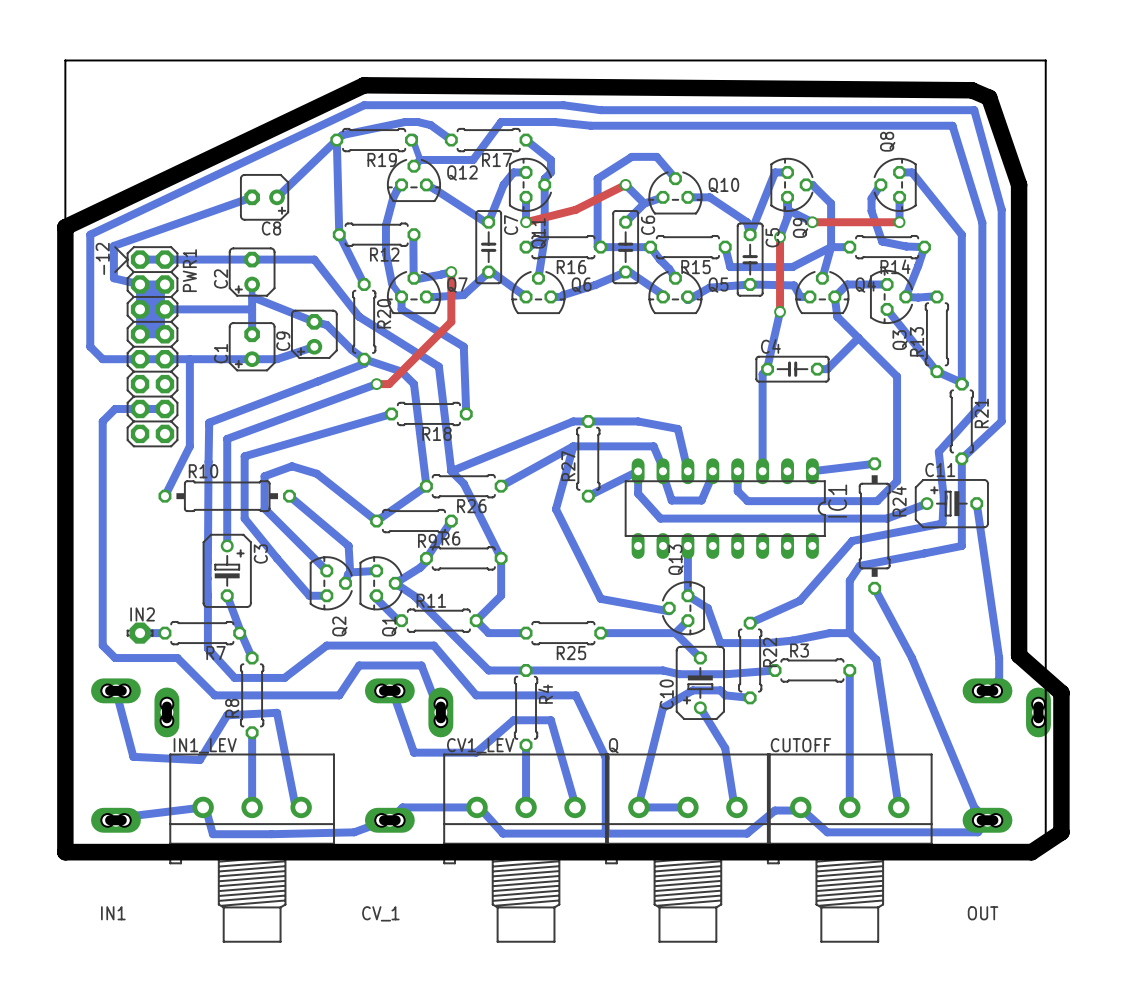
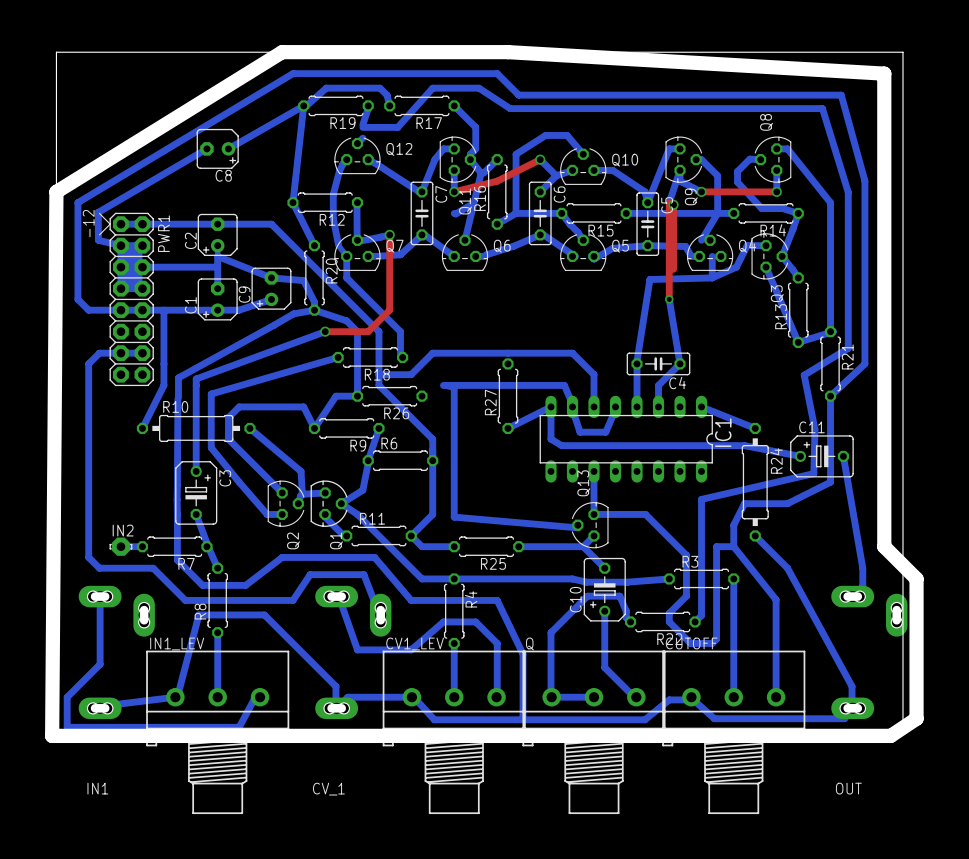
bottom track: (600, 110) (563, 105) (364, 105) (90, 234) -> (518, 95) (497, 73) (292, 73) (77, 202)
bottom track: none -> (303, 105) (306, 105) (326, 88) (380, 88) (387, 95) (389, 105)
bottom track: none -> (303, 105) (228, 148)
bottom track: (590, 125) (554, 122) (501, 122) (473, 159) (420, 159) (412, 139) (413, 138) (411, 140) -> (510, 108) (478, 88) (432, 88) (397, 127) (362, 127) (368, 105)
bottom track: (336, 140) (339, 234) -> (303, 105) (292, 202)
bottom track: (336, 140) (277, 197) -> none
bottom track: (336, 140) (342, 135) (405, 122) (417, 122) (430, 125) (451, 140) -> none
R19 position: (374, 140) -> (335, 105)
R17 position: (488, 140) -> (421, 105)
bottom track: (526, 140) (550, 159) -> (454, 105) (475, 127) (475, 138)
bottom track: (544, 184) (544, 237) (538, 278) -> (481, 173) (464, 240)
bottom track: none -> (470, 159) (481, 173)
bottom track: none -> (497, 159) (483, 173) (481, 173)
bottom track: (880, 184) (871, 198) (871, 211) (882, 241) (906, 246) (924, 247) -> (760, 159) (749, 159) (737, 171) (737, 182) (761, 208) (782, 208) (798, 213)
bottom track: (252, 197) (113, 245) -> (206, 148) (98, 212)
C8 position: (264, 197) -> (217, 148)
bottom track: none -> (680, 170) (669, 202)
bottom track: (787, 209) (787, 217) (780, 237) -> none
top track: none -> (669, 202) (669, 299)
R16 rotation: 0° (563, 247) -> 90° clockwise (497, 191)
bottom track: none -> (516, 213) (497, 224)
bottom track: (725, 247) (730, 267) (792, 267) (831, 247) (822, 278) -> (626, 213) (717, 213) (701, 240)
bottom track: (314, 259) (359, 316) (438, 366) (451, 471) -> (271, 224) (378, 331) (378, 385) (432, 439) (432, 482)
bottom track: (865, 284) (847, 284) (834, 296) (837, 316) (897, 376) (897, 481) (877, 501) (747, 501) (737, 491) (737, 471) -> (712, 277) (649, 279) (637, 361) (637, 406)
bottom track: none -> (747, 245) (736, 267) (712, 277)
bottom track: none -> (712, 256) (712, 277)
bottom track: (905, 296) (936, 296) -> (782, 256) (798, 277)
bottom track: (401, 309) (463, 346) (466, 413) -> (346, 267) (346, 277) (400, 331) (400, 353)
bottom track: (887, 309) (936, 371) (964, 384) -> (766, 267) (798, 342) (833, 331)
bottom track: (780, 311) (767, 369) (762, 374) (762, 446) -> (669, 299) (680, 363) (658, 385)
via: (780, 311) -> none
bottom track: (314, 321) (326, 324) (351, 349) (364, 359) (364, 363) (209, 422) (207, 648) (234, 677) -> (271, 277) (303, 280) (314, 302) (314, 310) (293, 313) (178, 377) (177, 560) (202, 585)
top track: (451, 321) (389, 384) -> (389, 277) (389, 310) (368, 331) (335, 331)
R13 position: (936, 334) -> (798, 310)
bottom track: (858, 338) (827, 369) (817, 369) -> none
via: none -> (669, 299)
C4 rotation: 0° (792, 369) -> 180° (658, 363)
C4 position: (792, 369) -> (658, 363)
bottom track: (413, 384) (426, 486) (376, 521) (316, 473) (291, 466) (264, 476) (264, 483) -> (357, 331) (357, 396) (335, 396) (314, 428) (303, 406) (239, 406) (228, 417)
bottom track: (982, 403) (938, 451) (943, 497) (942, 523) (852, 540) (799, 600) (750, 623) -> (848, 348) (804, 375) (814, 429) (813, 473) (701, 499) (701, 615) (695, 621)
bottom track: (874, 463) (812, 471) -> (755, 428) (701, 406)
bottom track: (451, 471) (573, 421) (638, 421) (677, 428) (687, 471) -> (378, 374) (411, 374) (432, 353) (572, 353) (594, 374) (594, 406)
bottom track: (451, 471) (463, 483) (501, 558) -> none
R26 position: (463, 486) -> (389, 396)
bottom track: (501, 486) (573, 446) (555, 509) (600, 598) (669, 611) -> (495, 385) (443, 385) (454, 388) (454, 517) (577, 527)
bottom track: (638, 493) (660, 518) (887, 518) (926, 503) -> (551, 426) (551, 439) (561, 445) (744, 445) (800, 456)
C11 position: (951, 503) -> (821, 456)
bottom track: (976, 503) (999, 658) -> (843, 456) (862, 568)
R9 position: (413, 521) -> (346, 428)
bottom track: (451, 521) (426, 558) (426, 561) (420, 567) -> (378, 428) (368, 460) (362, 490)
R24 position: (874, 526) -> (755, 482)
bottom track: (961, 545) (859, 565) (849, 580) (849, 608) -> (830, 471) (830, 482) (787, 503) (744, 503) (733, 525)
R6 position: (463, 558) -> (400, 460)
bottom track: (874, 588) (912, 658) (974, 807) (986, 819) -> (755, 535) (787, 568) (852, 686) (852, 707)
bottom track: (687, 595) (707, 608) (720, 643) (767, 643) (829, 633) -> (594, 514) (645, 514) (686, 555) (686, 596) (669, 613) (669, 621) (690, 643) (712, 643) (716, 639) (716, 546)
bottom track: (849, 633) (876, 659) (898, 807) -> (733, 546) (776, 599) (776, 697)
R22 rotation: 0° (750, 660) -> 90° clockwise (662, 621)
R22 position: (750, 660) -> (662, 621)
bottom track: (115, 690) (133, 756) (199, 760) (227, 715) (277, 712) (295, 807) -> (100, 596) (100, 664) (67, 697) (67, 727) (239, 727) (255, 697)
bottom track: (692, 690) (663, 707) (638, 807) -> (598, 596) (587, 596) (551, 632) (551, 697)
bottom track: (717, 690) (725, 695) (750, 697) -> (619, 596) (626, 611) (626, 617) (630, 621)
board edge: (1061, 692) (1019, 655) (1019, 184) (989, 97) (971, 90) (364, 85) (65, 227) (65, 852) -> (916, 598) (916, 578) (884, 546) (884, 73) (507, 52) (282, 52) (56, 191) (52, 735) (56, 735)
bottom track: (700, 707) (725, 748) (734, 807) -> (604, 611) (604, 667) (634, 697)
bottom track: (550, 720) (575, 806) -> (475, 621) (497, 643) (497, 696)
bottom track: (205, 807) (212, 834) (354, 832) (389, 819) -> (177, 697) (198, 614) (264, 614) (335, 686) (335, 707)

